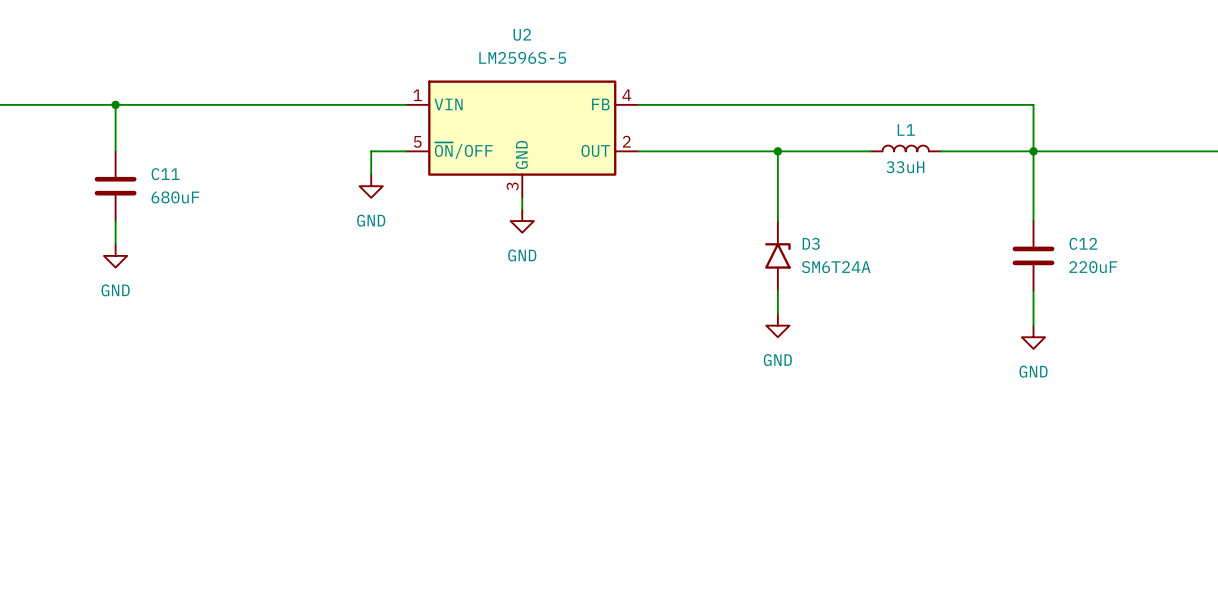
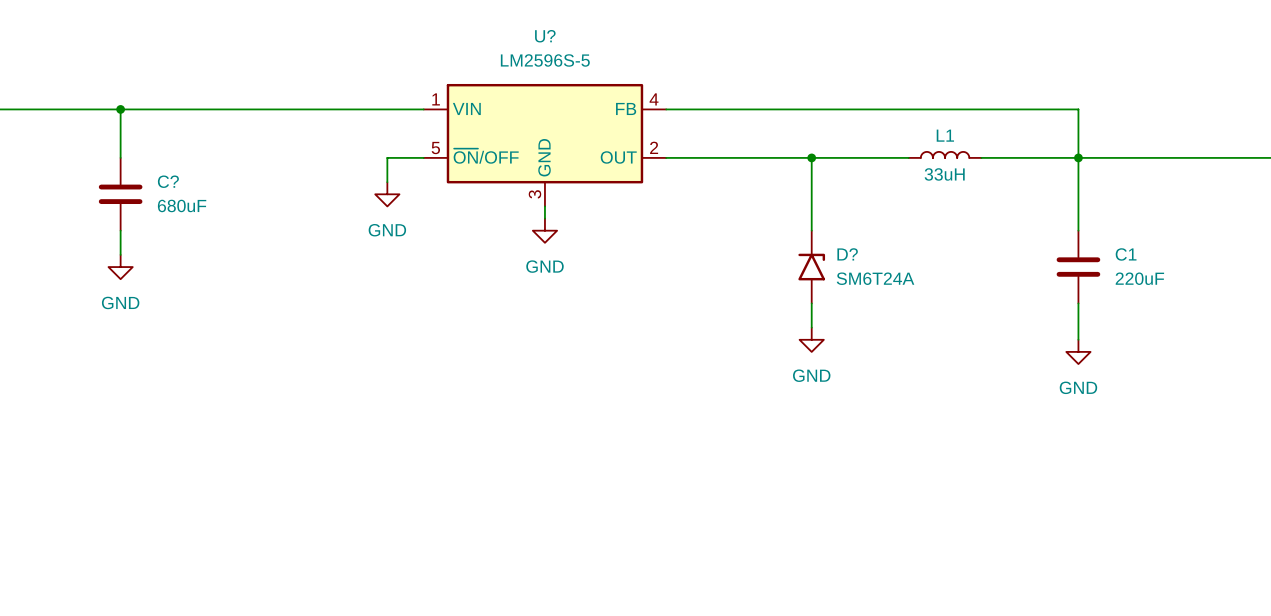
U2 name: U2 (522, 34) -> U? (545, 36)
C11 name: C11 (165, 174) -> C? (168, 181)
D3 name: D3 (811, 243) -> D? (847, 254)
C12 name: C12 (1083, 243) -> C1 (1126, 254)

